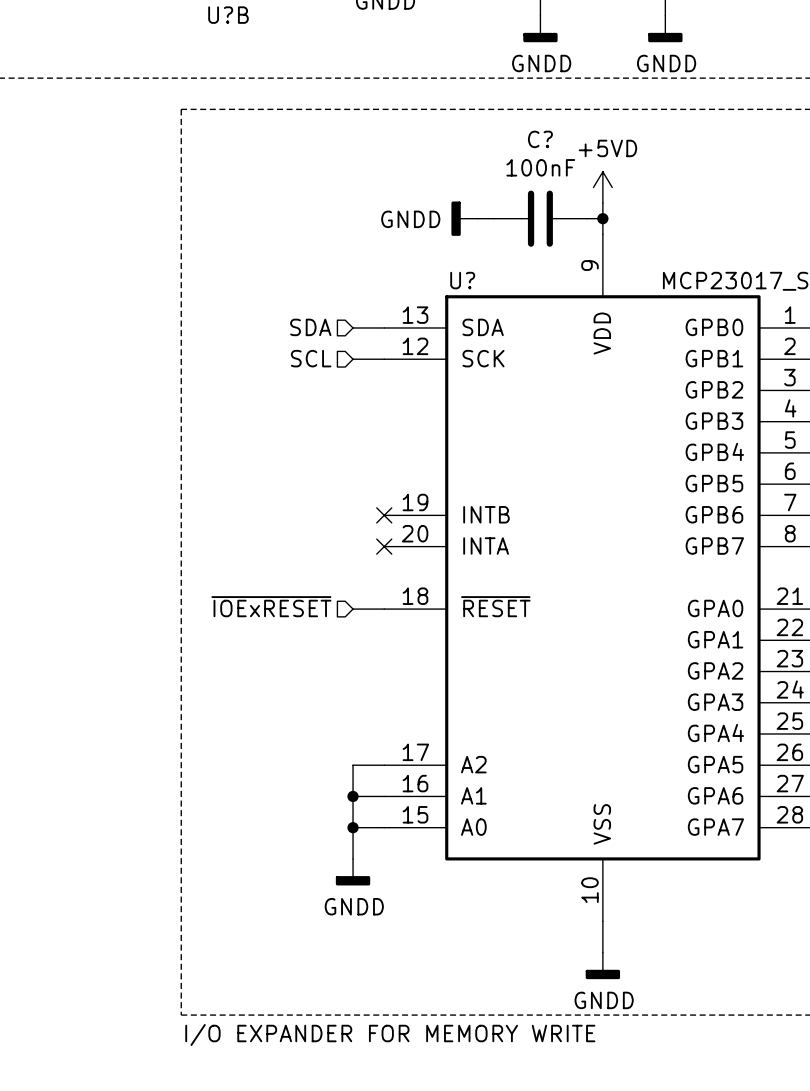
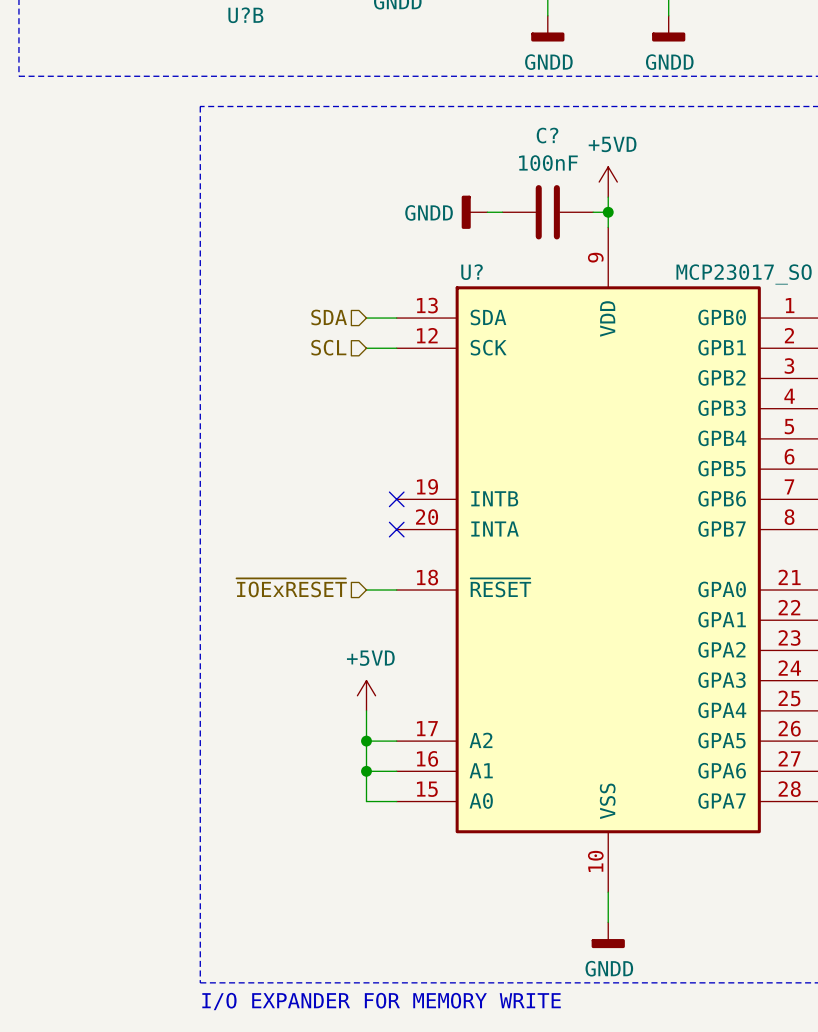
power symbol: none -> +5VD (366, 695)
wire: (353, 827) (353, 858) -> (366, 710) (366, 741)
junction position: (353, 827) -> (366, 741)
power symbol: GNDD (353, 872) -> none

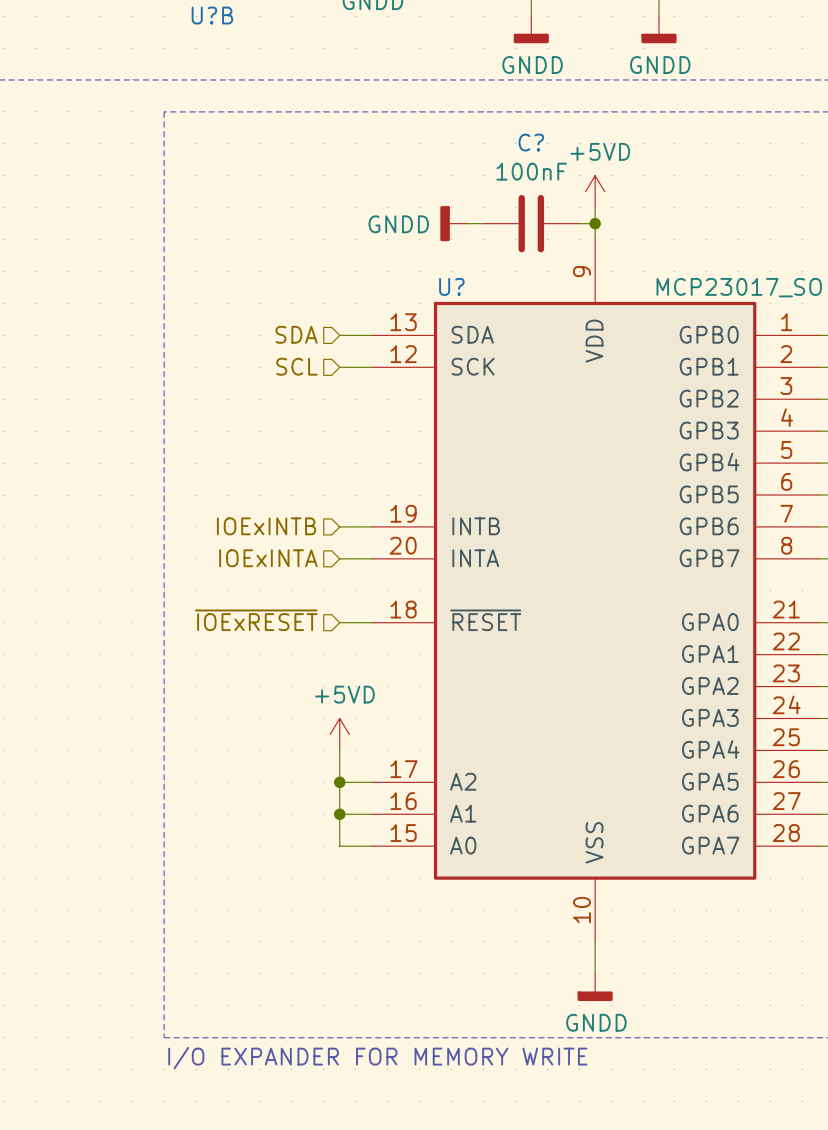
hierarchical label: none -> IOExINTB (266, 526)
wire: none -> (339, 526) (371, 526)
no-connect mark: (396, 499) -> none
hierarchical label: none -> IOExINTA (268, 558)
wire: none -> (339, 558) (371, 558)
no-connect mark: (396, 529) -> none

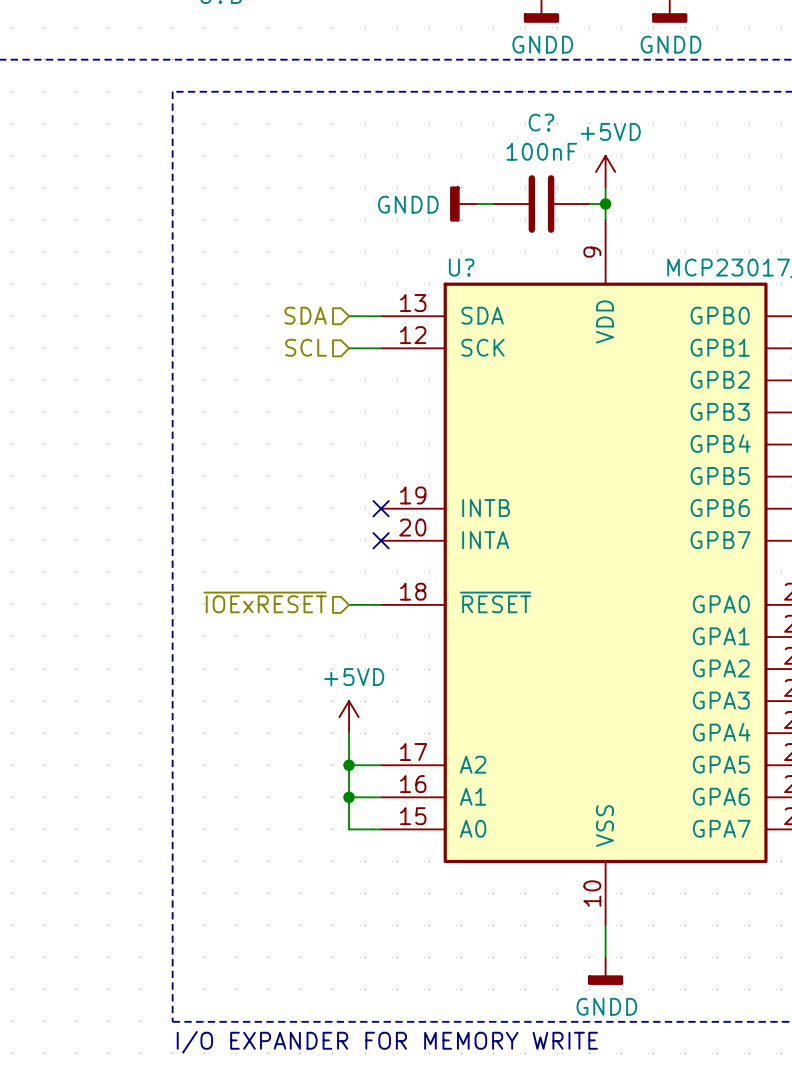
hierarchical label: IOExINTB (266, 526) -> none
wire: (339, 526) (371, 526) -> none
no-connect mark: none -> (381, 508)
hierarchical label: IOExINTA (268, 558) -> none
wire: (339, 558) (371, 558) -> none
no-connect mark: none -> (381, 540)

